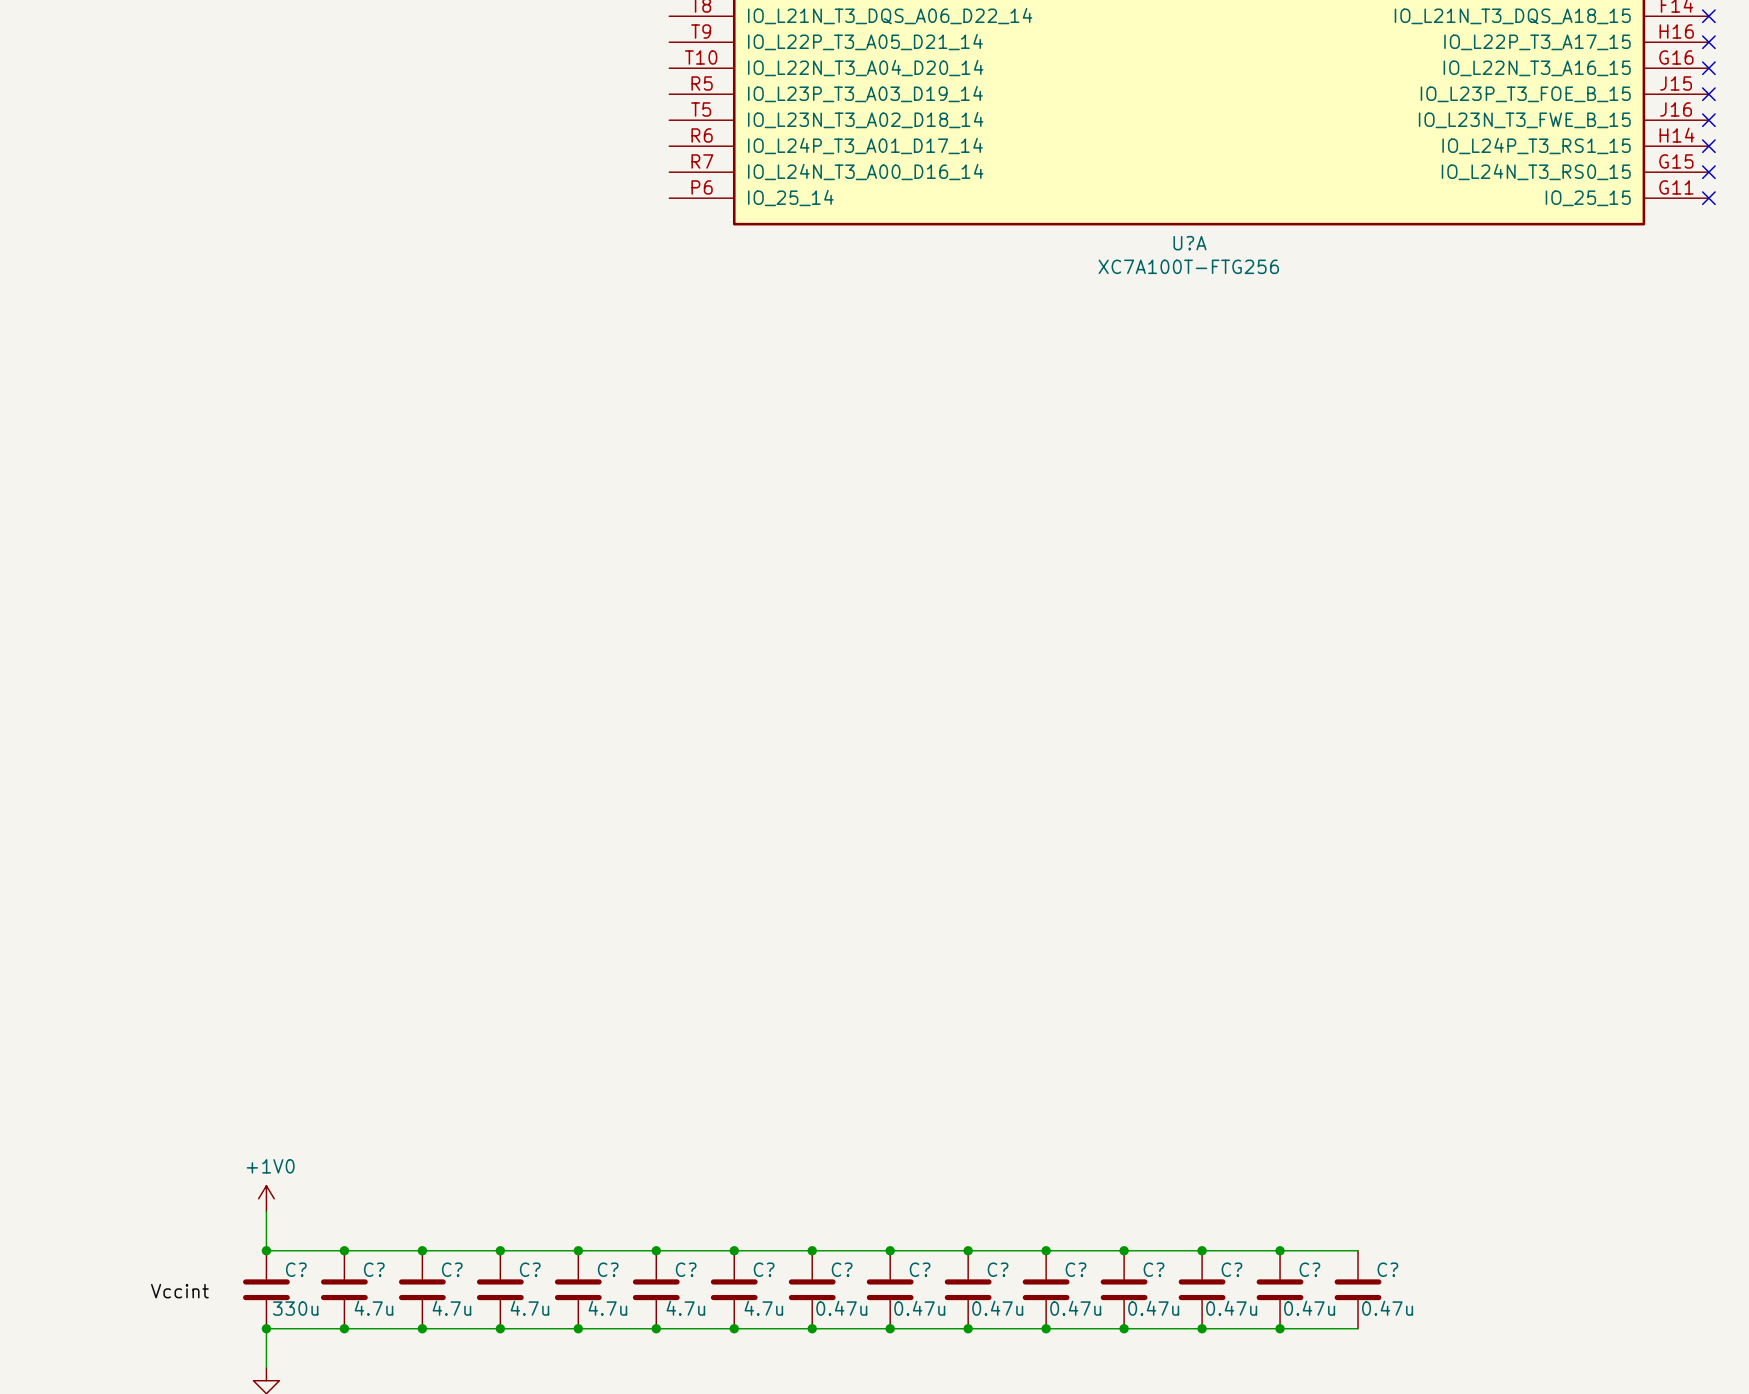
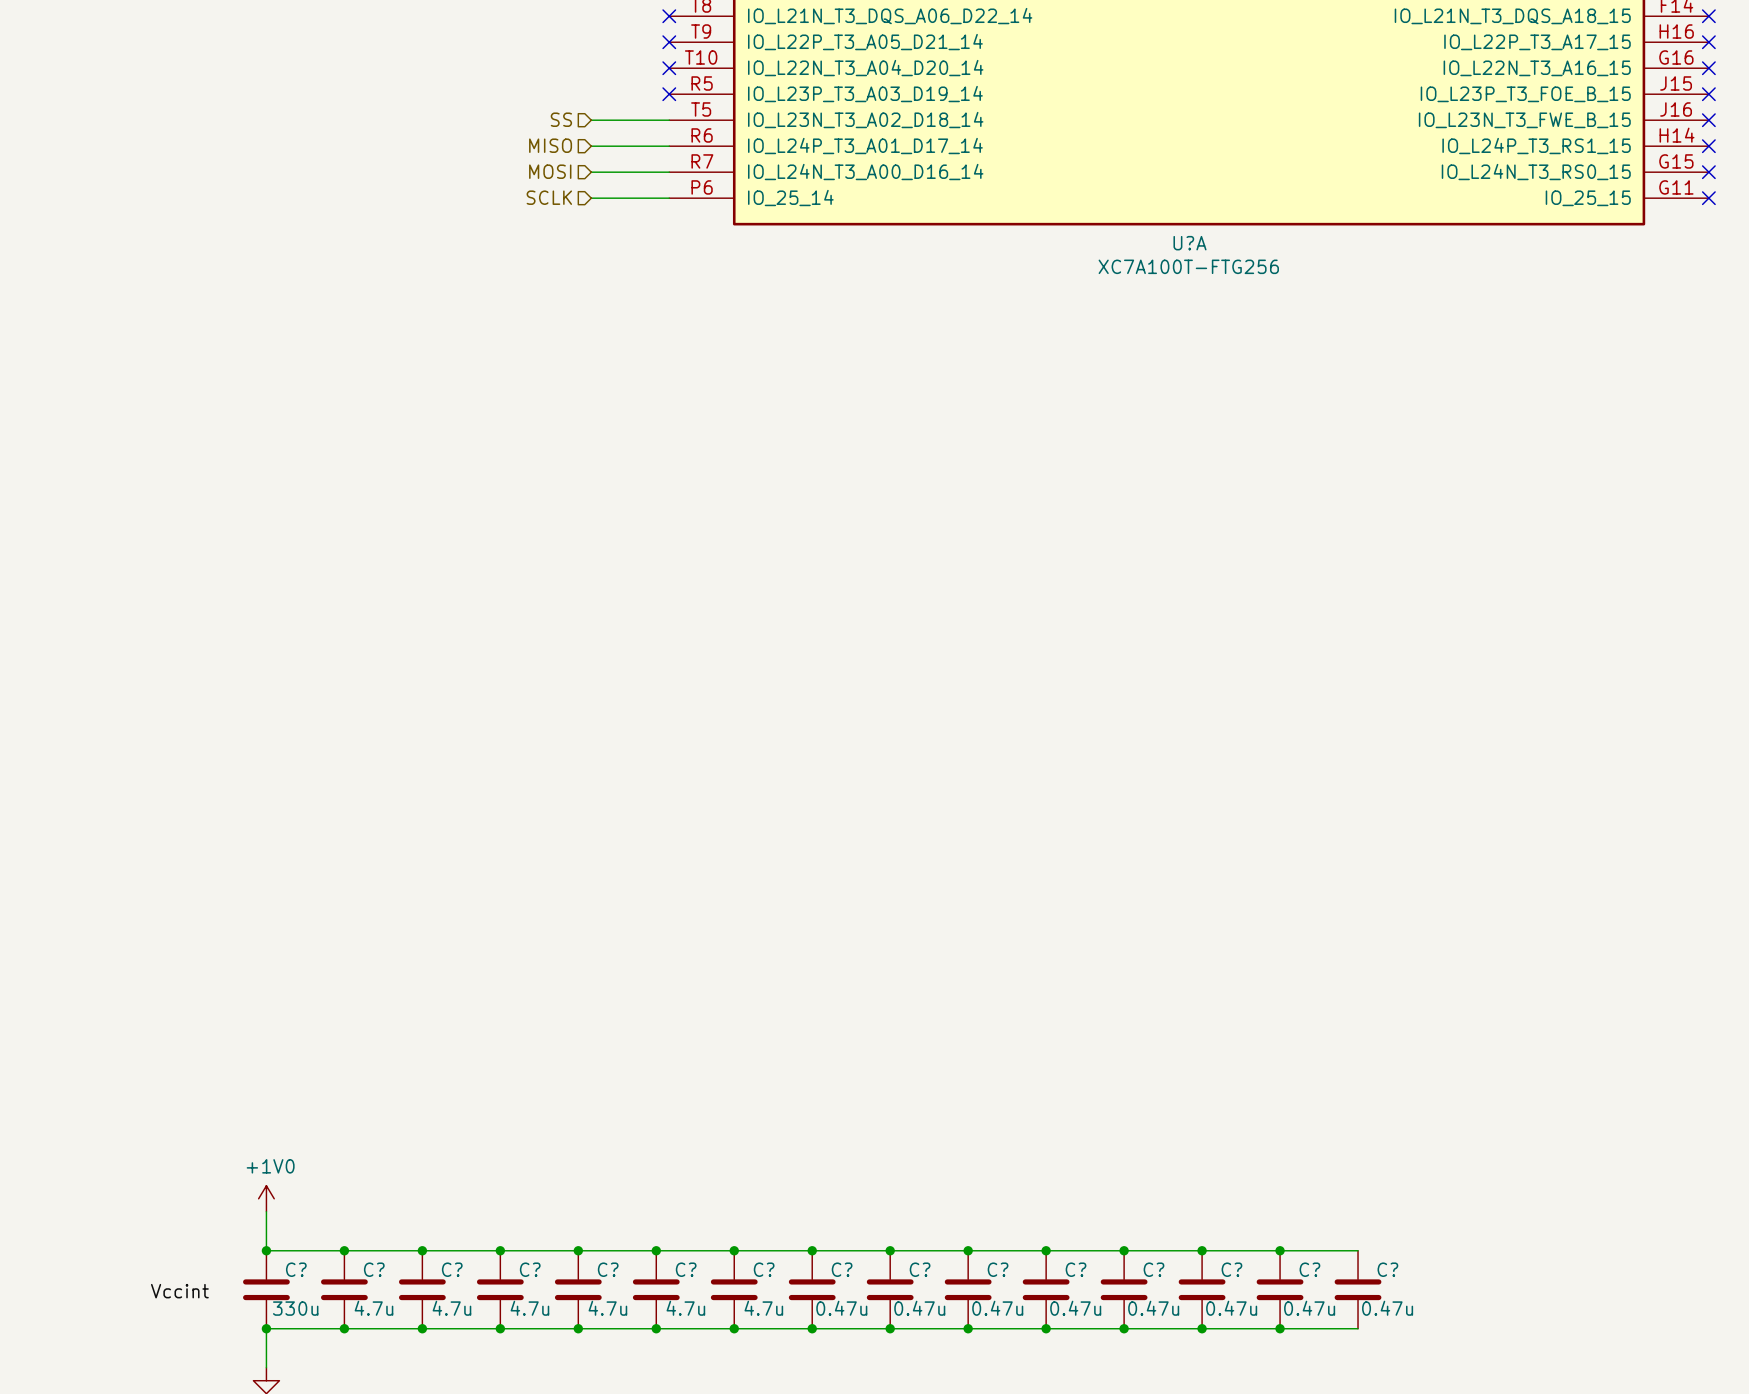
no-connect mark: none -> (669, 16)
no-connect mark: none -> (669, 42)
no-connect mark: none -> (669, 68)
no-connect mark: none -> (669, 94)
hierarchical label: none -> SS (561, 119)
wire: none -> (591, 120) (669, 120)
hierarchical label: none -> MISO (550, 145)
wire: none -> (591, 146) (669, 146)
hierarchical label: none -> MOSI (550, 171)
wire: none -> (591, 172) (669, 172)
hierarchical label: none -> SCLK (549, 197)
wire: none -> (591, 198) (669, 198)

